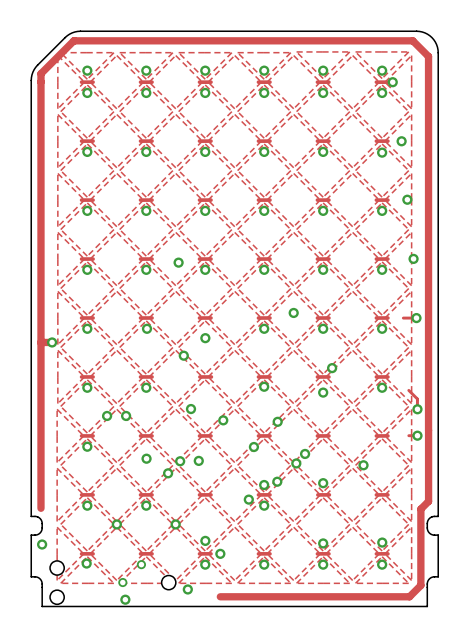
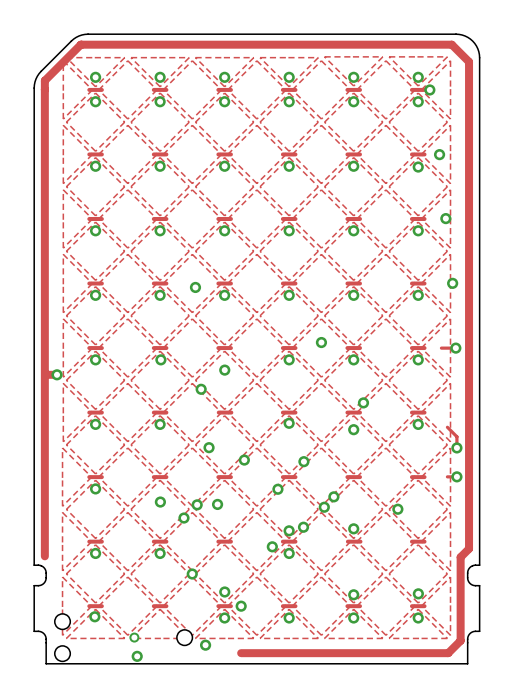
via: (107, 415) -> none
via: (126, 415) -> none
via: (116, 524) -> none
via: (42, 544) -> none
via: (141, 564) -> none

